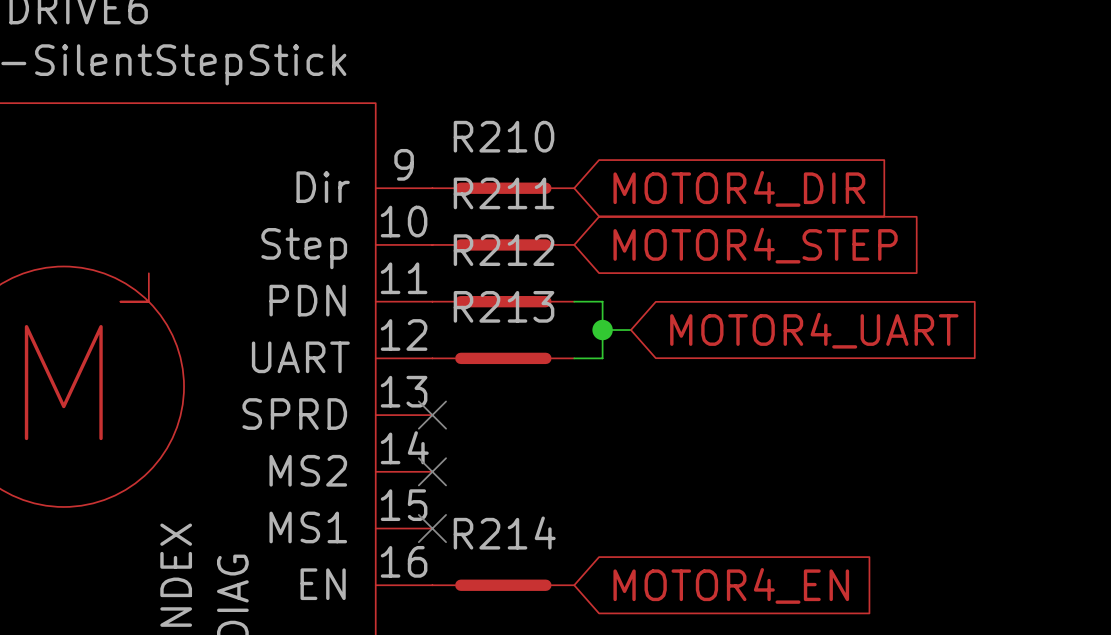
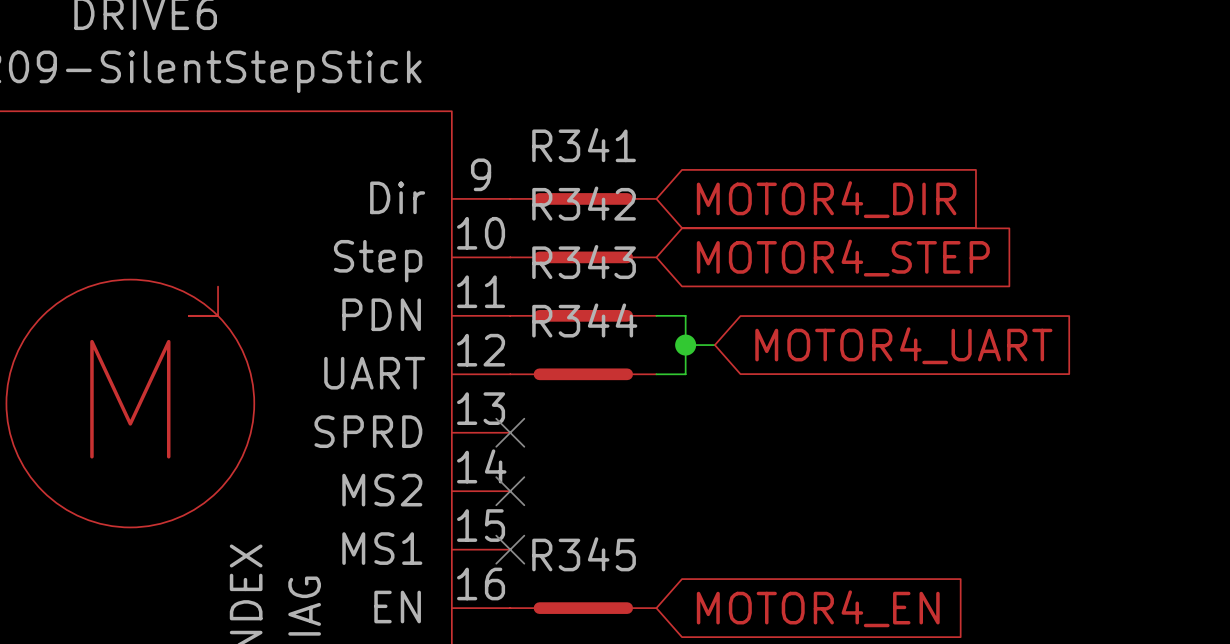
R210 name: R210 (504, 136) -> R341 (584, 145)
R211 name: R211 (504, 193) -> R342 (584, 203)
R212 name: R212 (504, 250) -> R343 (584, 262)
R213 name: R213 (504, 306) -> R344 (584, 320)
R214 name: R214 (504, 533) -> R345 (584, 554)

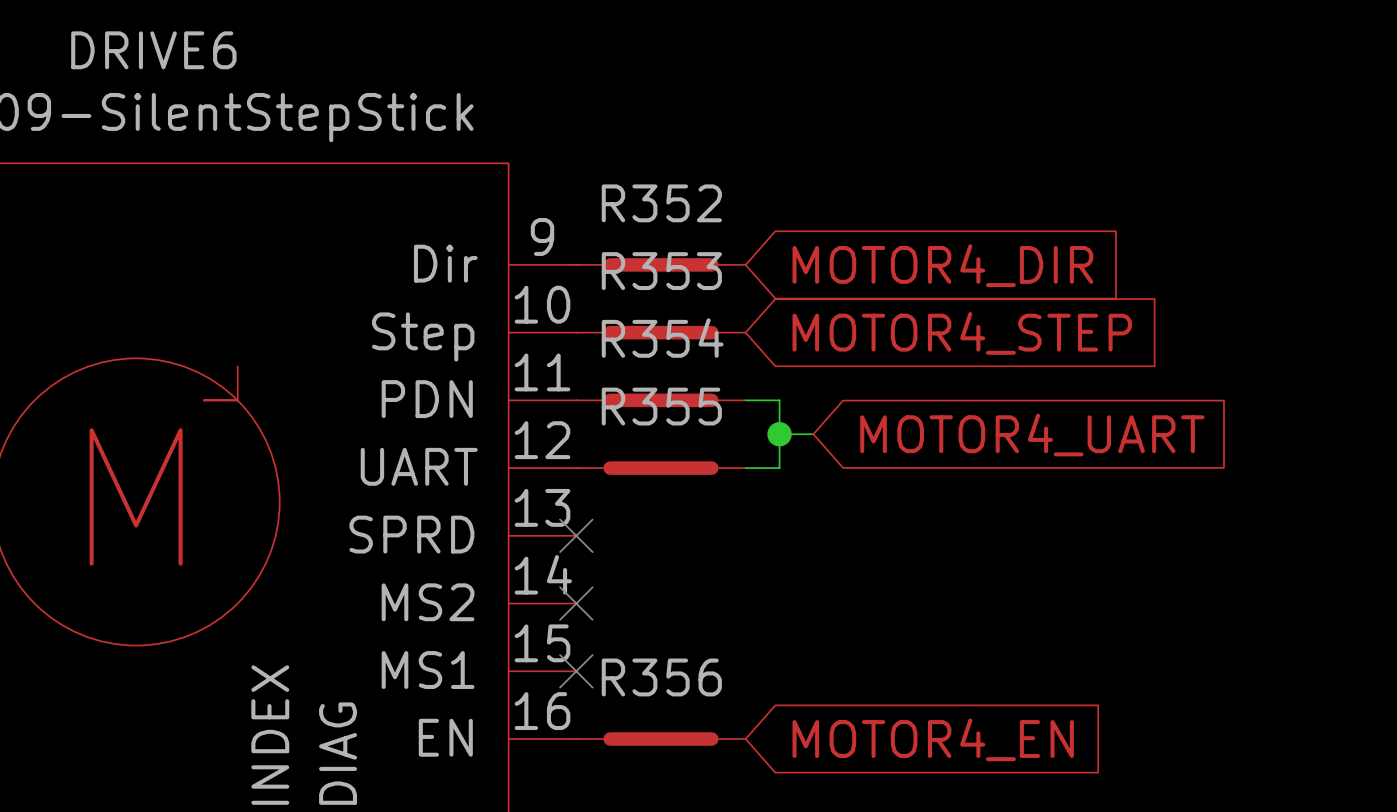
R341 name: R341 (584, 145) -> R352 (661, 203)
R342 name: R342 (584, 203) -> R353 (661, 271)
R343 name: R343 (584, 262) -> R354 (662, 338)
R344 name: R344 (584, 320) -> R355 (661, 406)
R345 name: R345 (584, 554) -> R356 (661, 677)

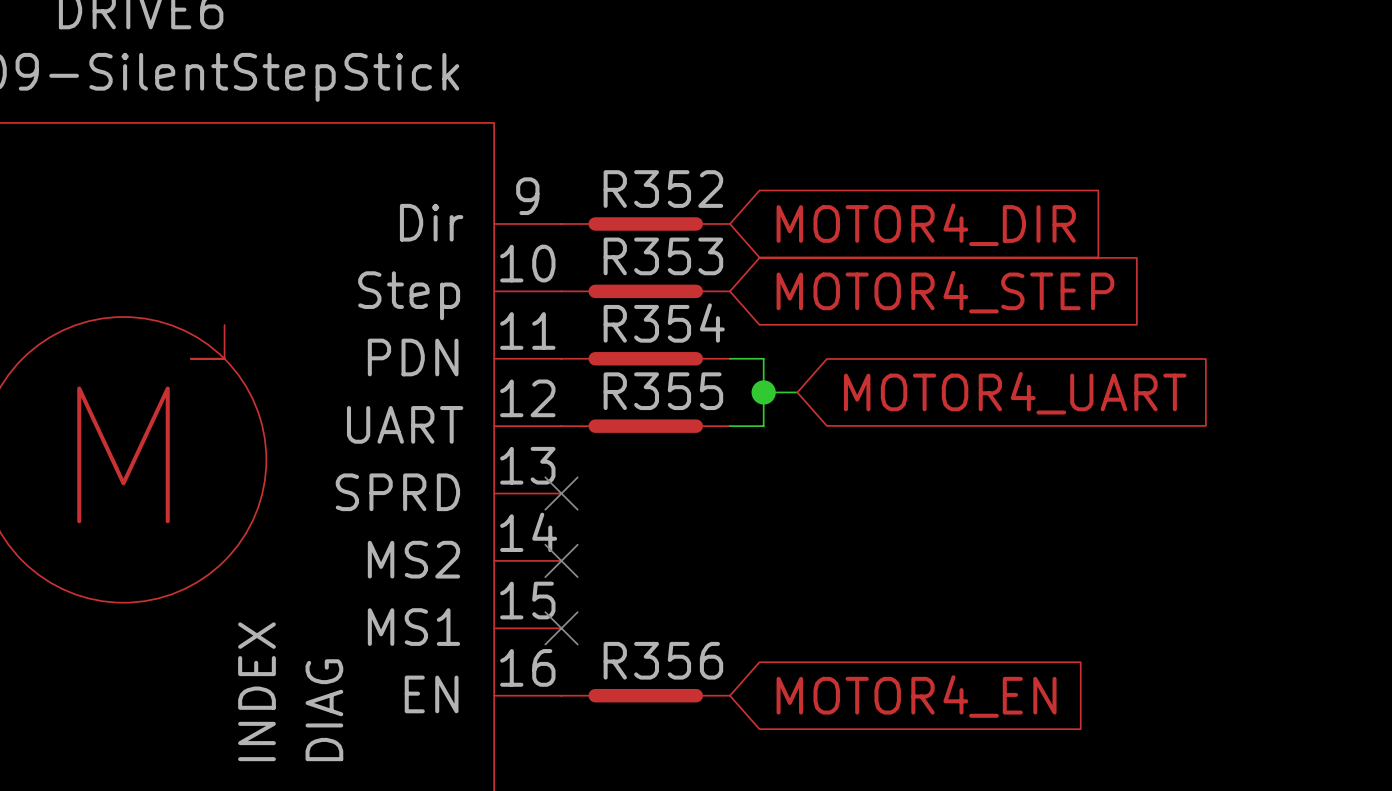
R352 name position: R352 (661, 203) -> R352 (663, 189)
R353 name position: R353 (661, 271) -> R353 (663, 256)
R354 name position: R354 (662, 338) -> R354 (664, 323)
R355 name position: R355 (661, 406) -> R355 (663, 391)
R356 name position: R356 (661, 677) -> R356 (663, 660)

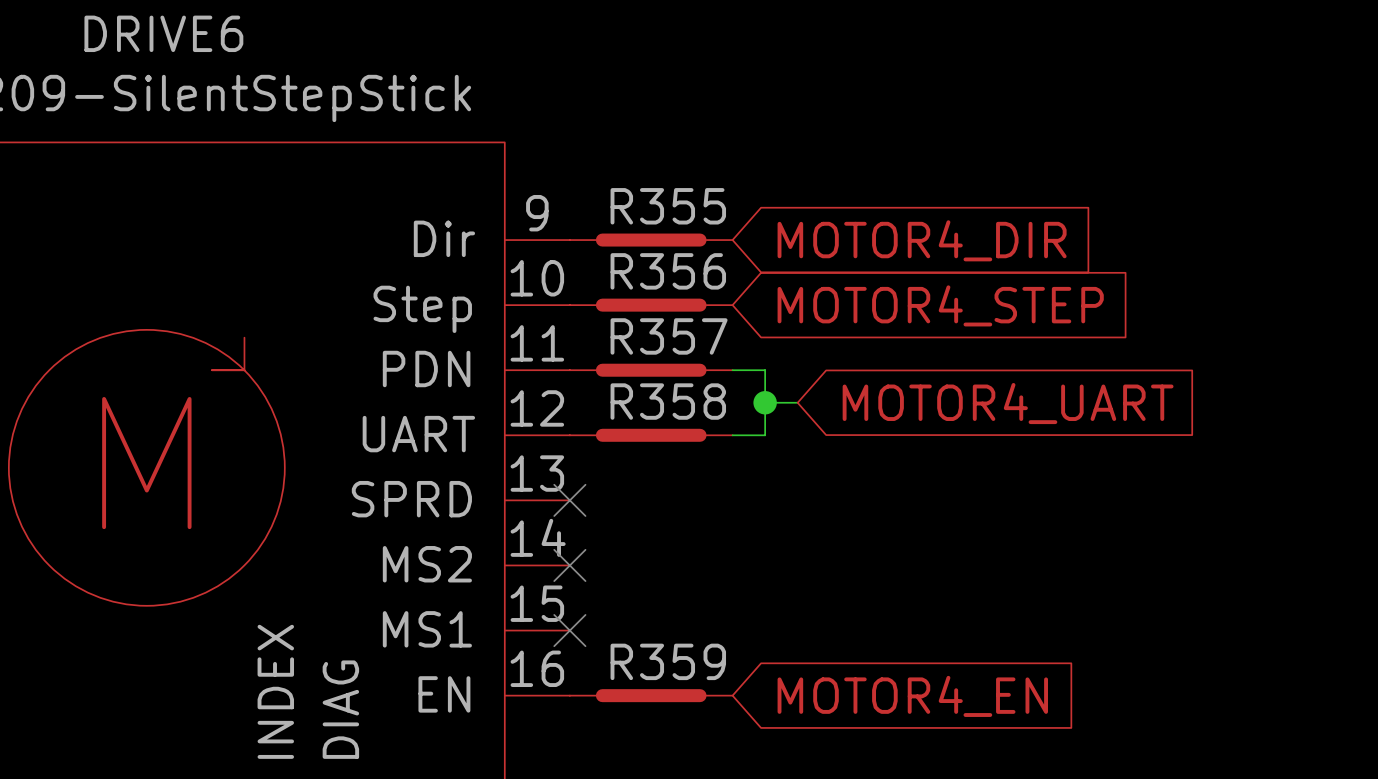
R352 name: R352 (663, 189) -> R355 (668, 206)
R353 name: R353 (663, 256) -> R356 (668, 271)
R354 name: R354 (664, 323) -> R357 (669, 336)
R355 name: R355 (663, 391) -> R358 (668, 401)
R356 name: R356 (663, 660) -> R359 (668, 661)

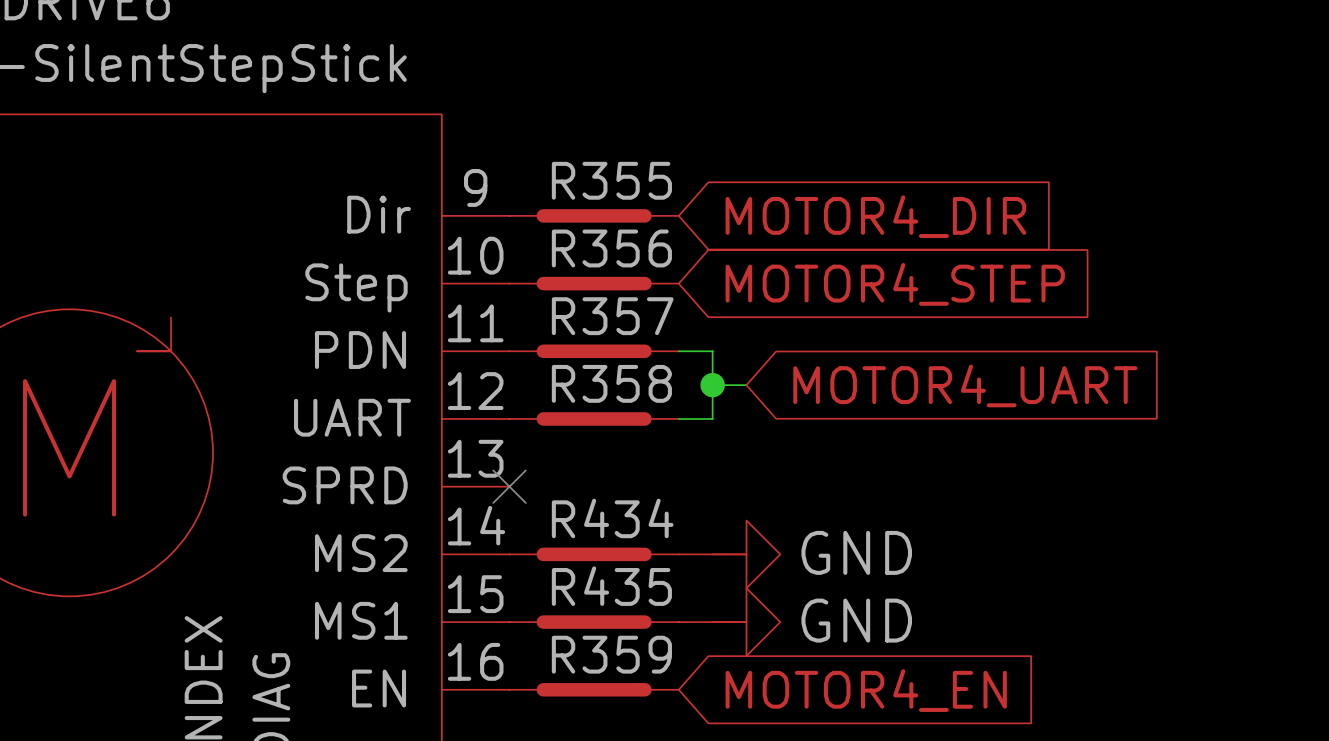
no-connect mark: (569, 565) -> none
R434: none -> (594, 554)
power symbol: none -> GND (729, 554)
no-connect mark: (569, 630) -> none
R435: none -> (594, 622)
power symbol: none -> GND (729, 622)

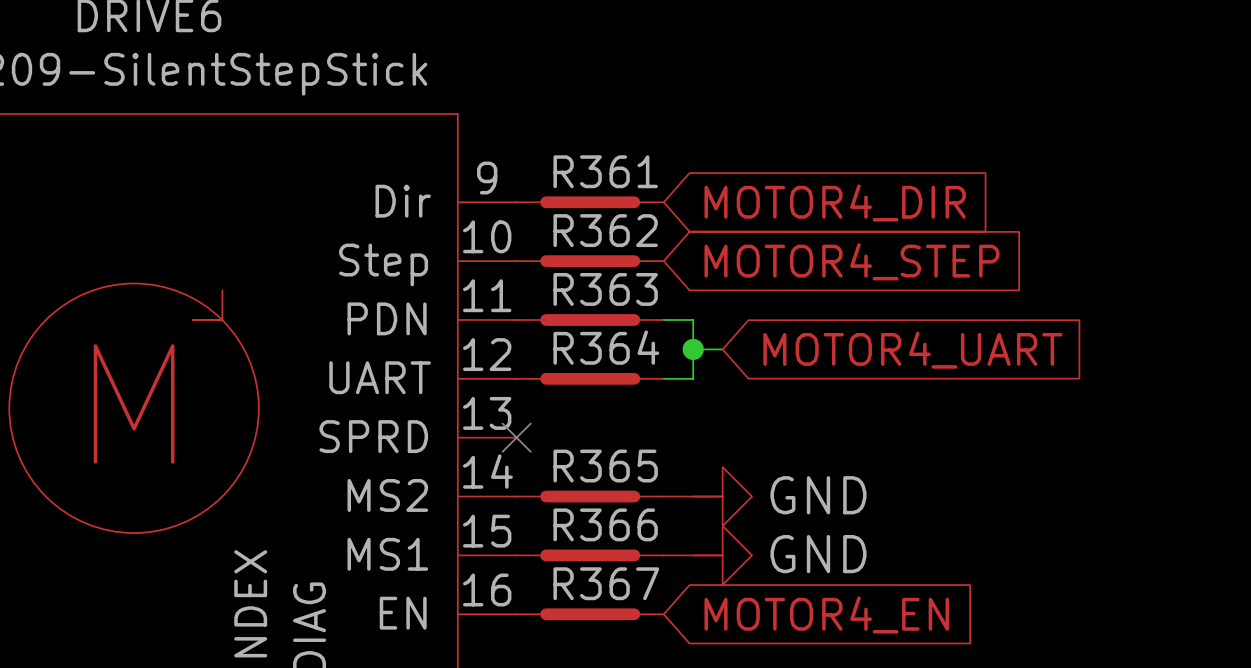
R355 name: R355 (611, 180) -> R361 (605, 171)
R356 name: R356 (611, 248) -> R362 (605, 230)
R357 name: R357 (612, 316) -> R363 (605, 289)
R358 name: R358 (611, 383) -> R364 (606, 347)
R434 name: R434 (612, 518) -> R365 (605, 466)
R435 name: R435 (611, 586) -> R366 (605, 524)
R359 name: R359 (611, 654) -> R367 (606, 583)

